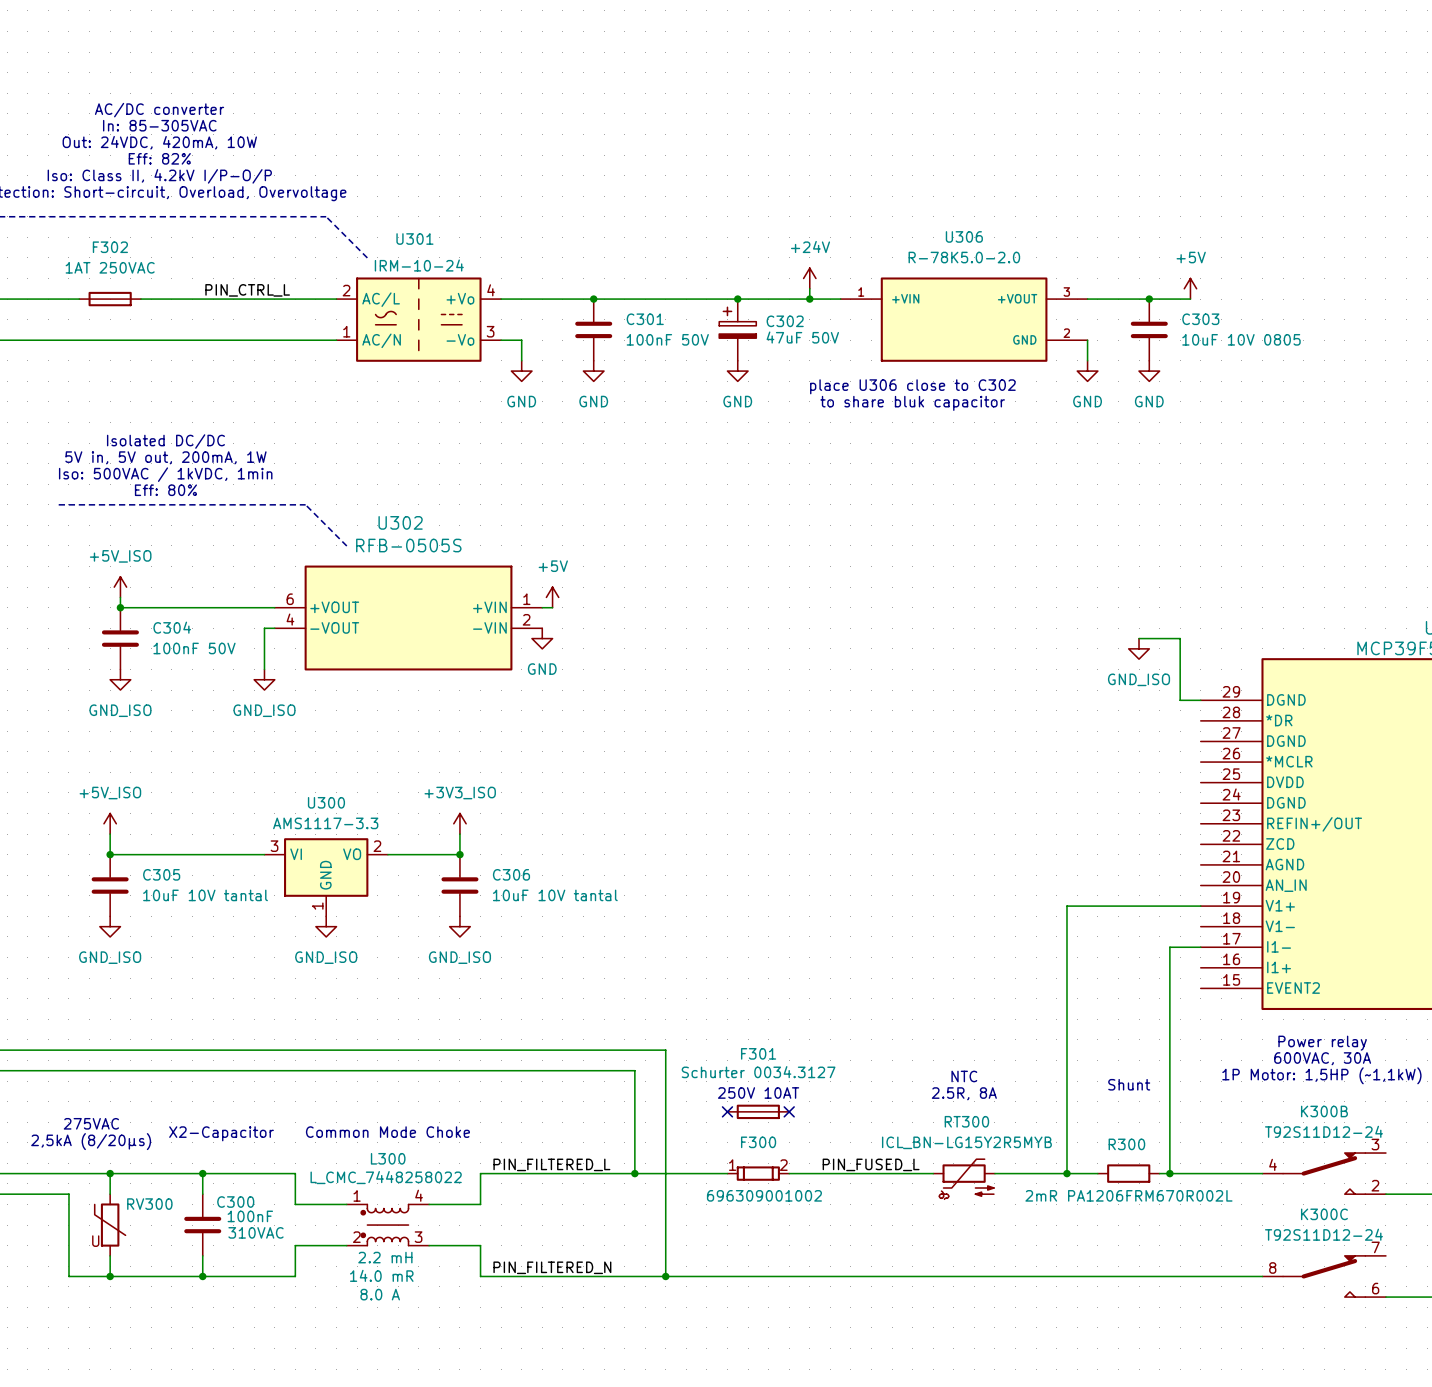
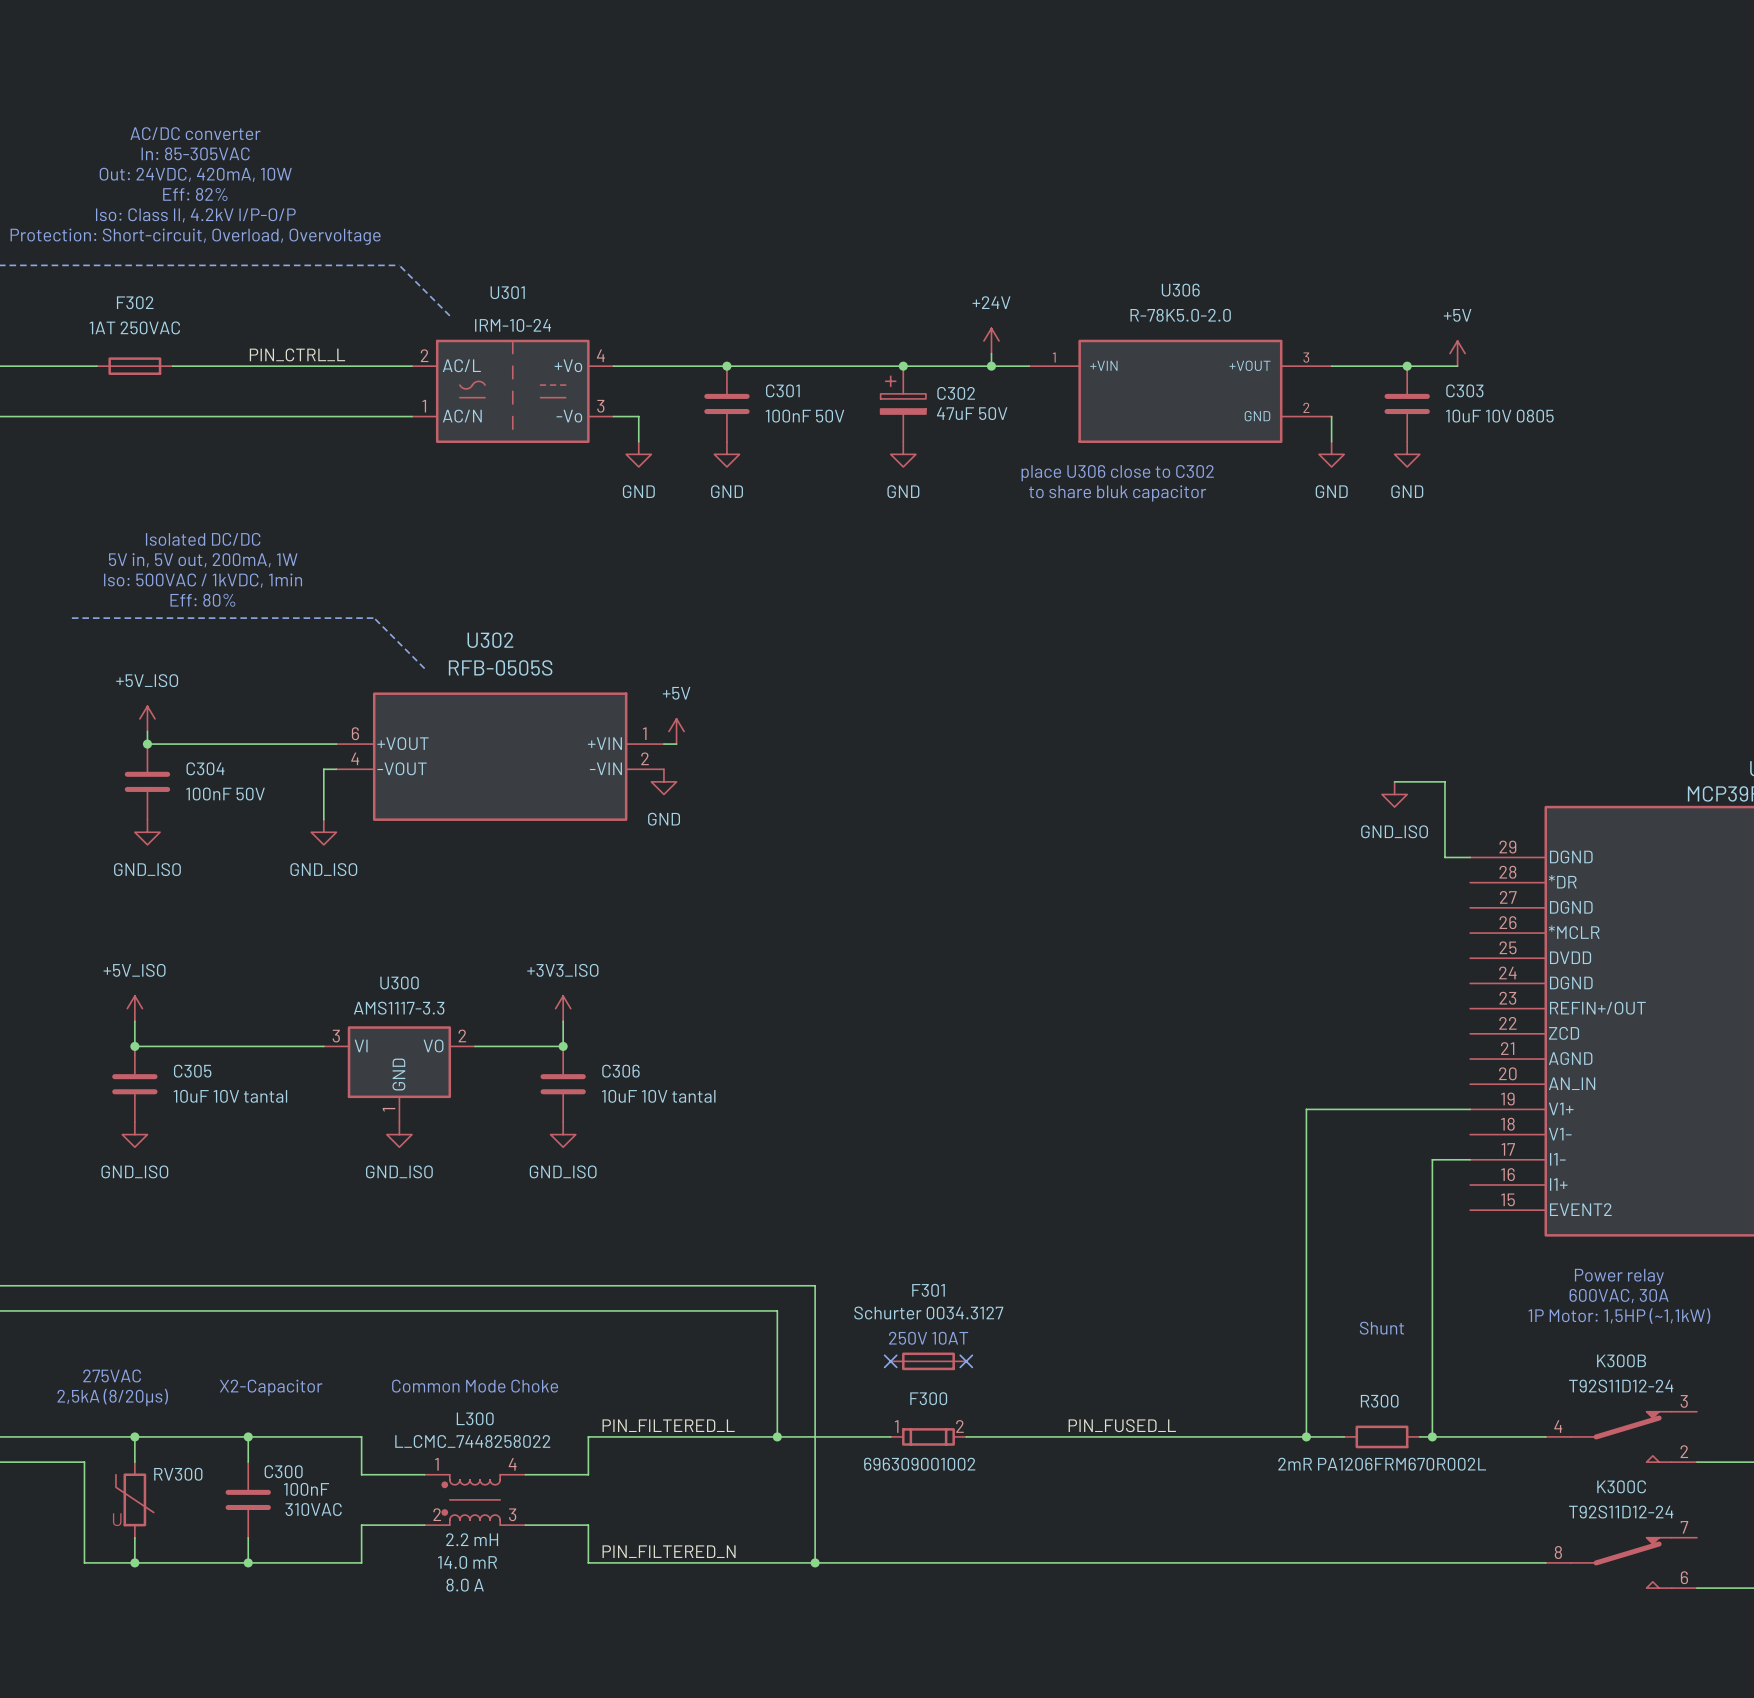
text: NTC (964, 1076) -> none
text: 2.5R, 8A (964, 1093) -> none
label position: PIN_FUSED_L (871, 1164) -> PIN_FUSED_L (1122, 1425)
wire: none -> (1142, 1436) (1218, 1436)
RT300: ICL_BN-LG15Y2R5MYB (964, 1179) -> none

